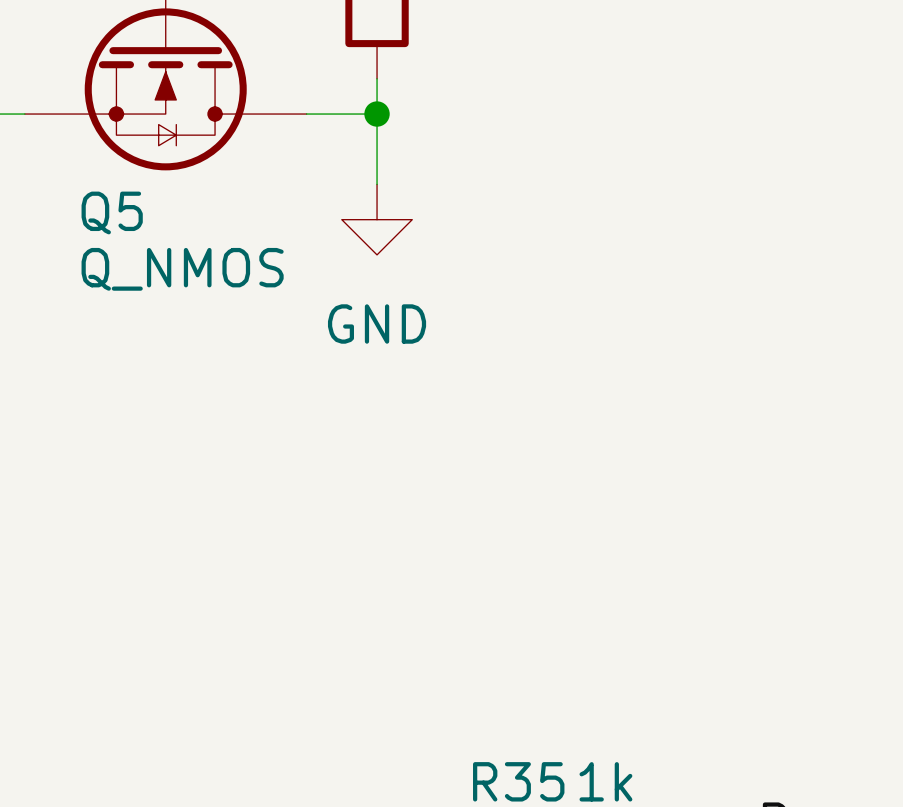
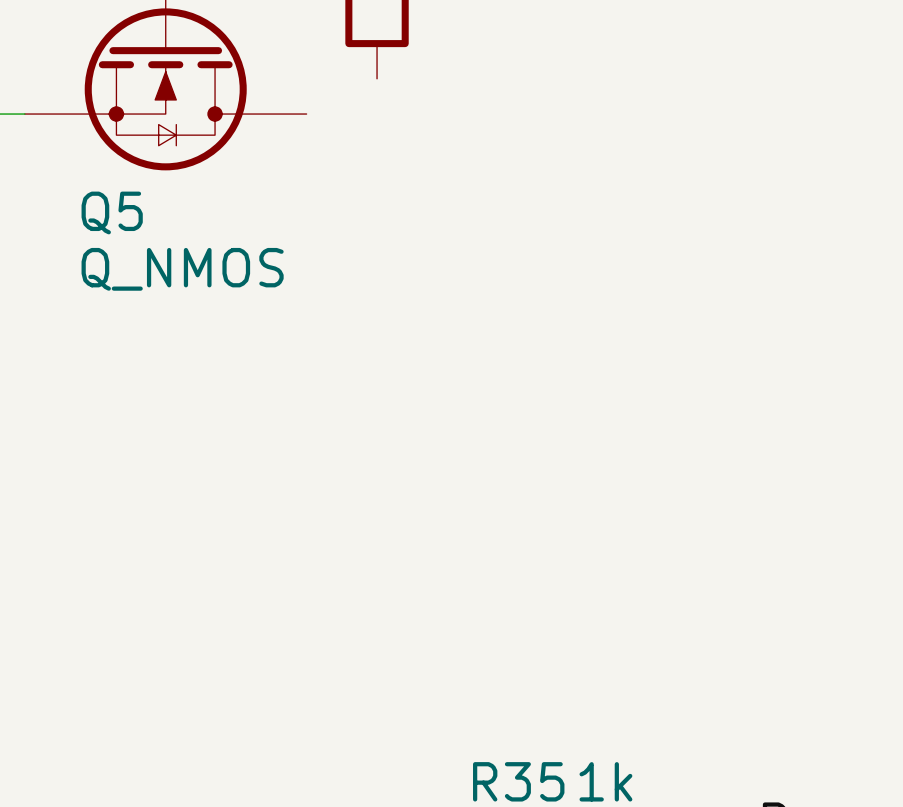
wire: (377, 78) (377, 184) -> none
wire: (306, 114) (377, 114) -> none
junction: (377, 114) -> none
power symbol: GND (377, 219) -> none

